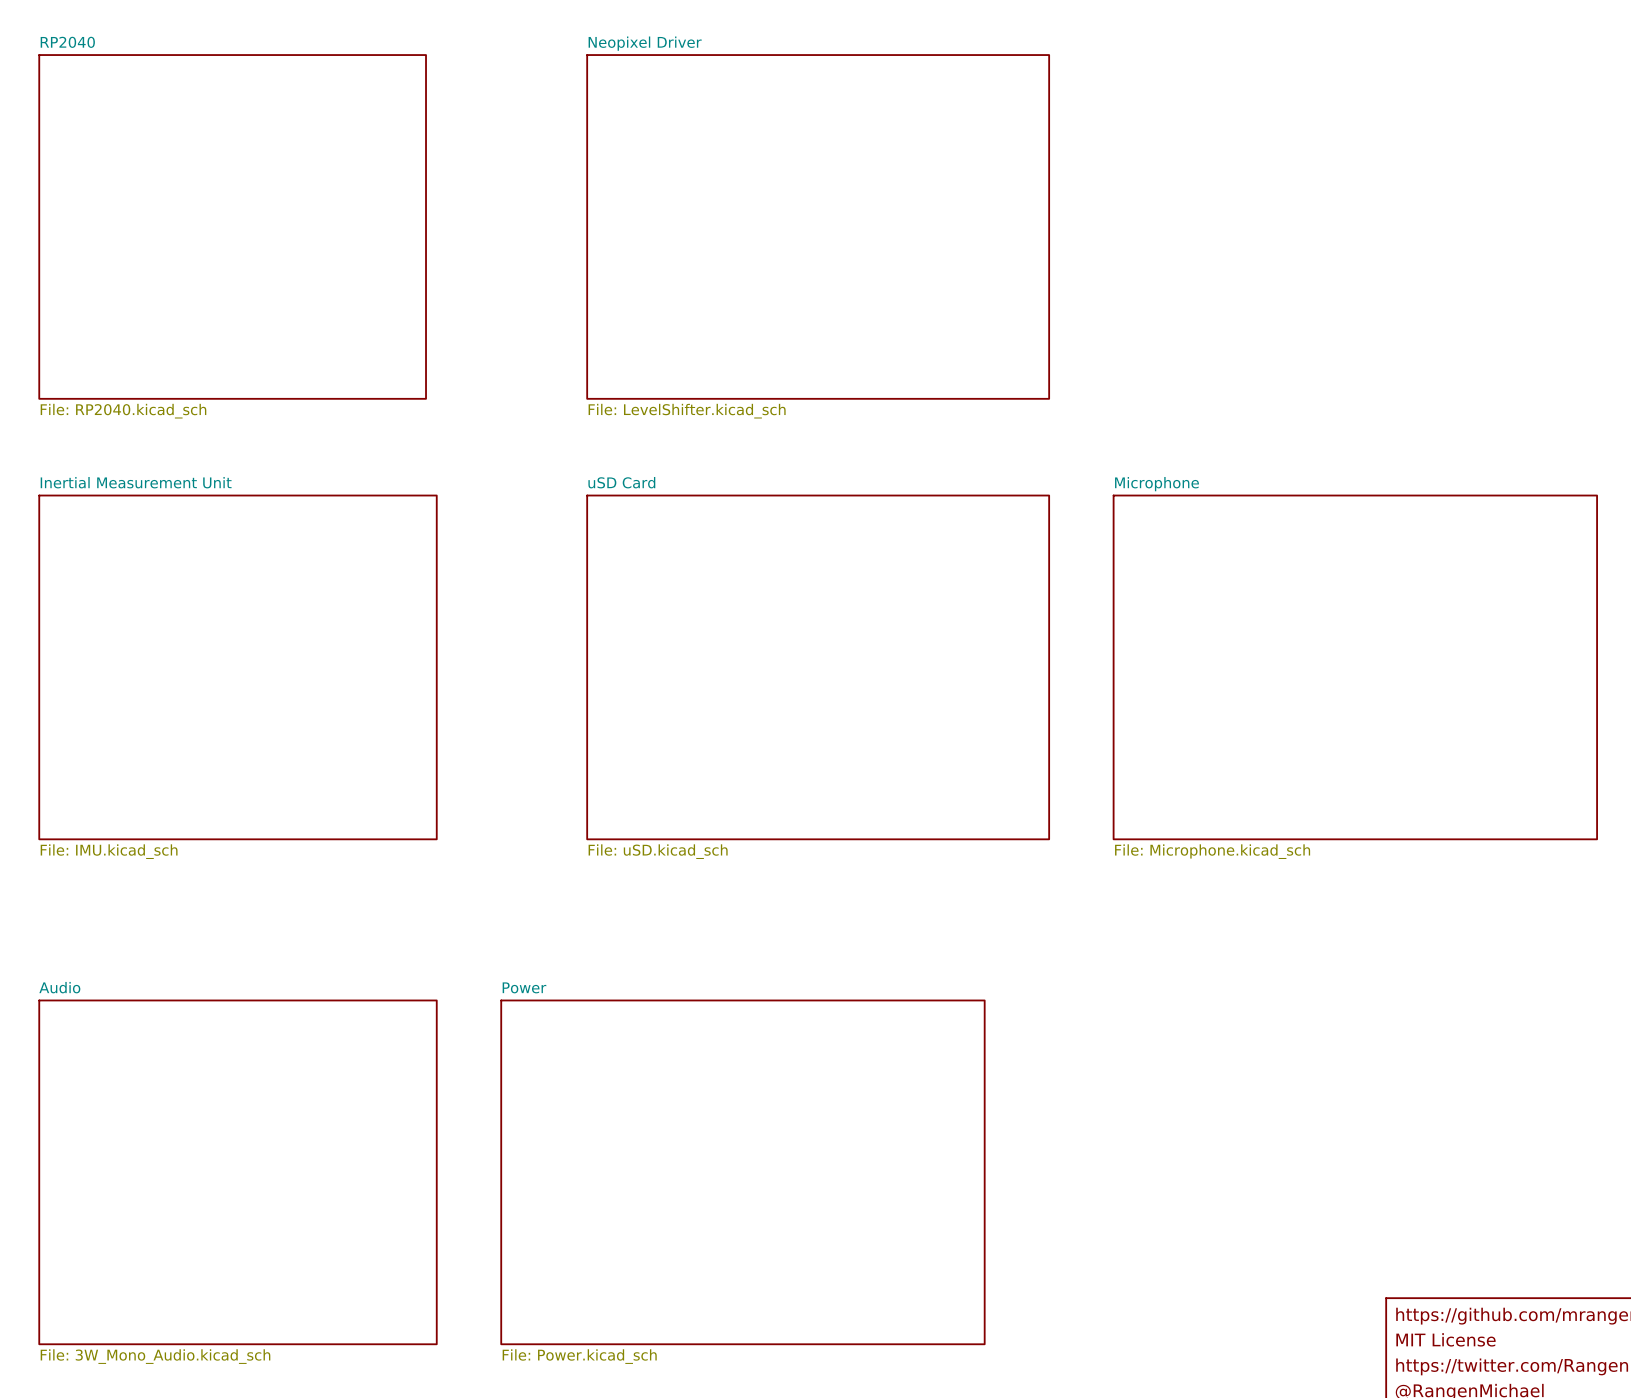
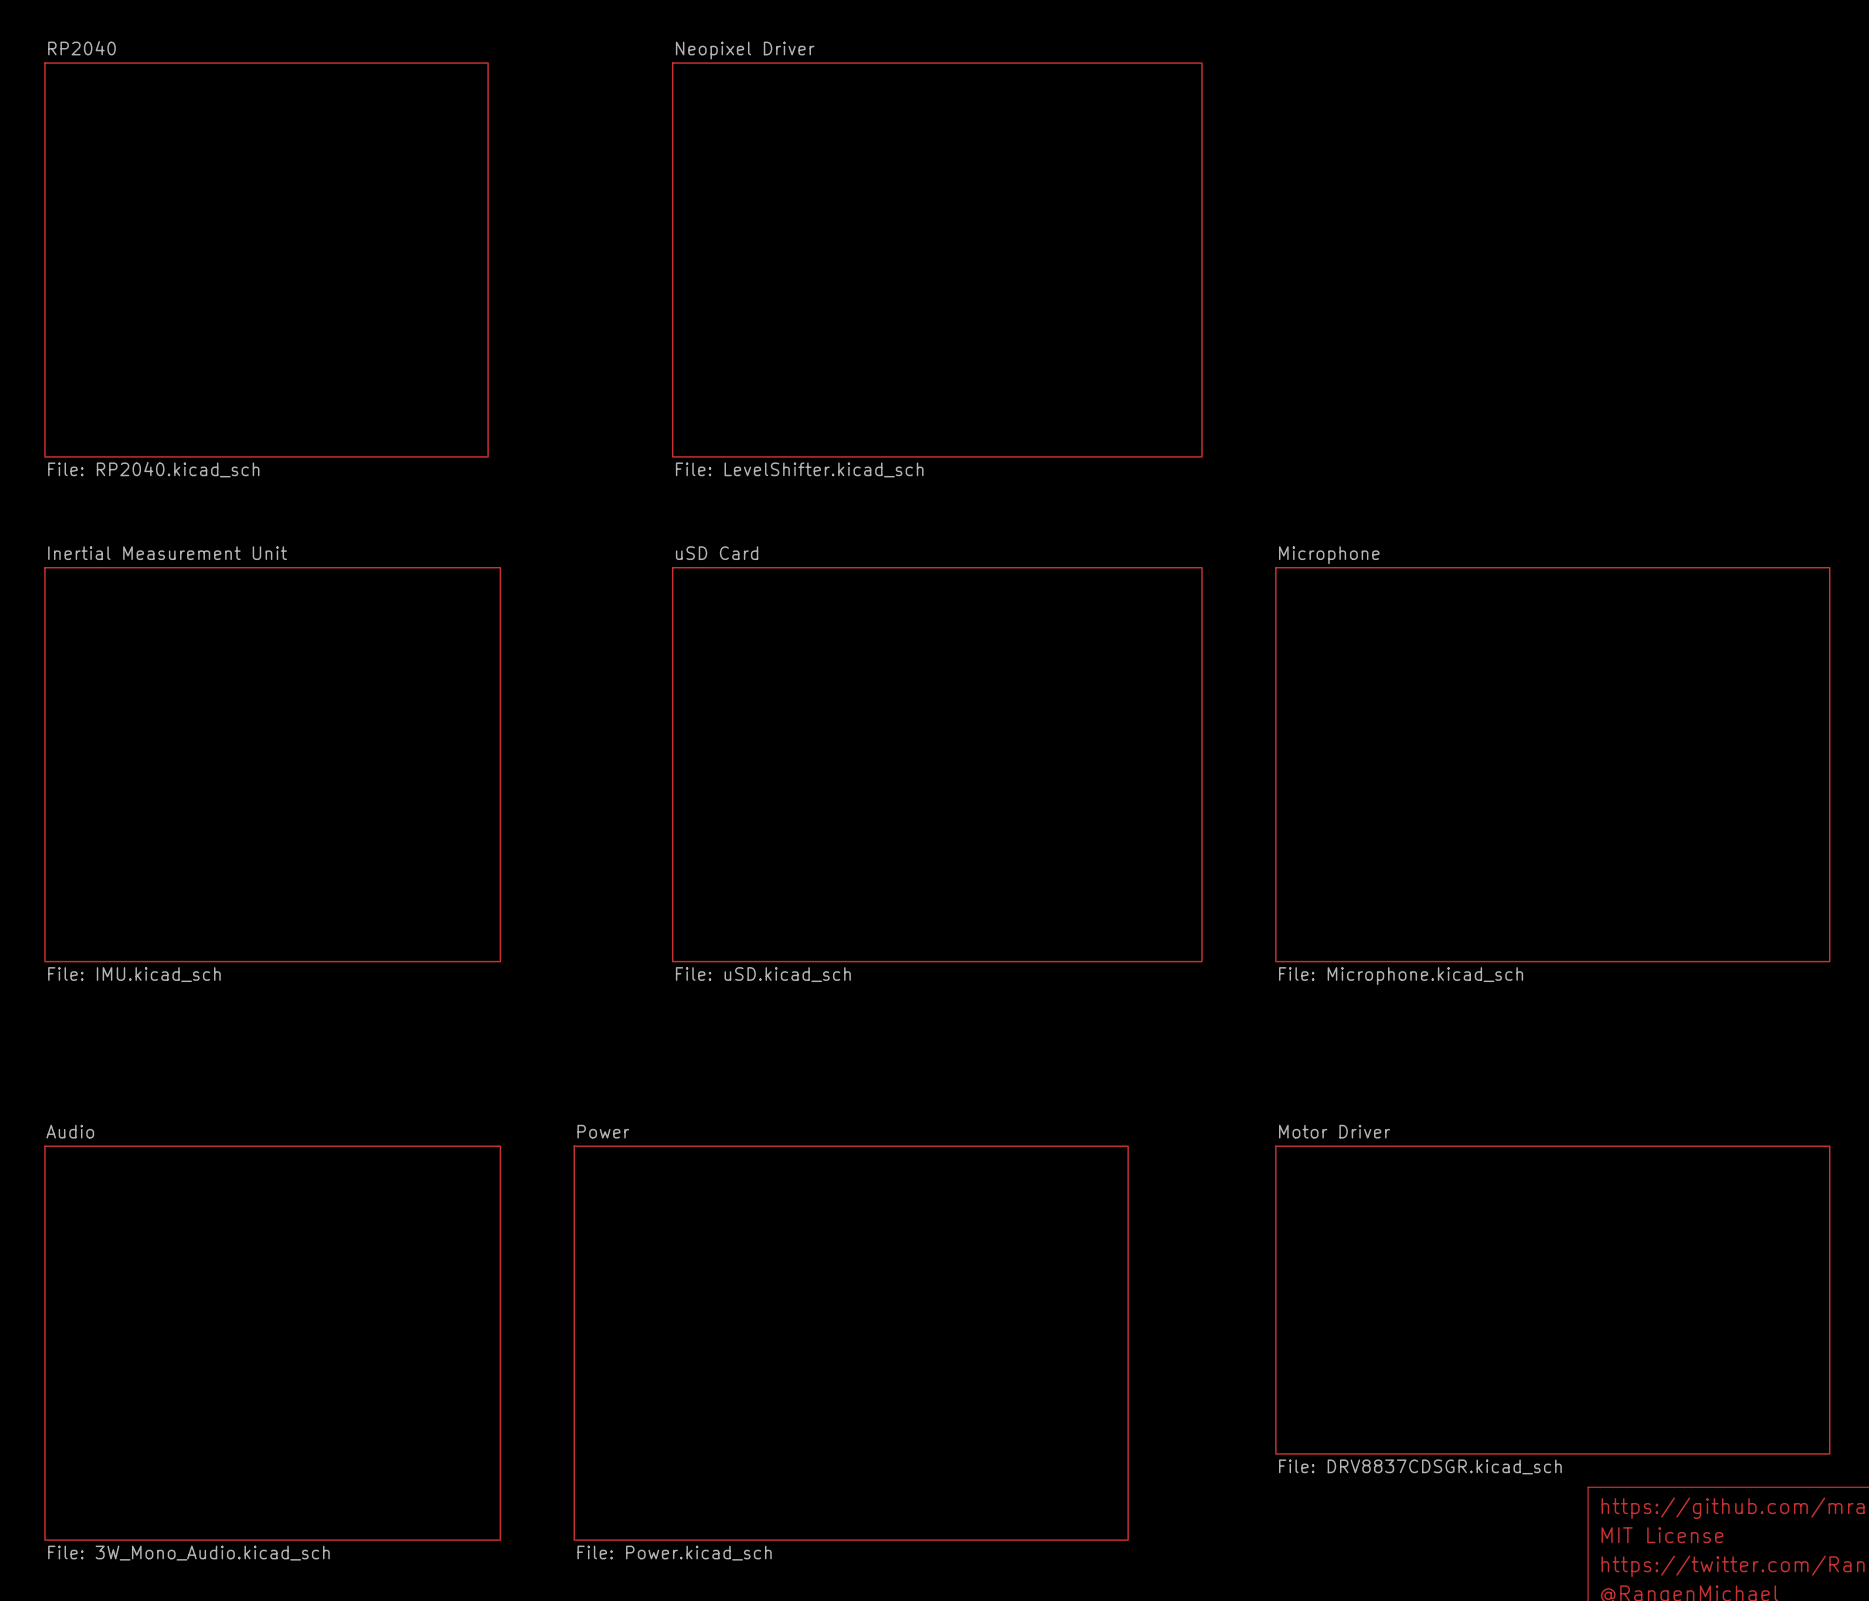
sheet Motor Driver: none -> File: DRV8837CDSGR.kicad_sch (1552, 1300)

